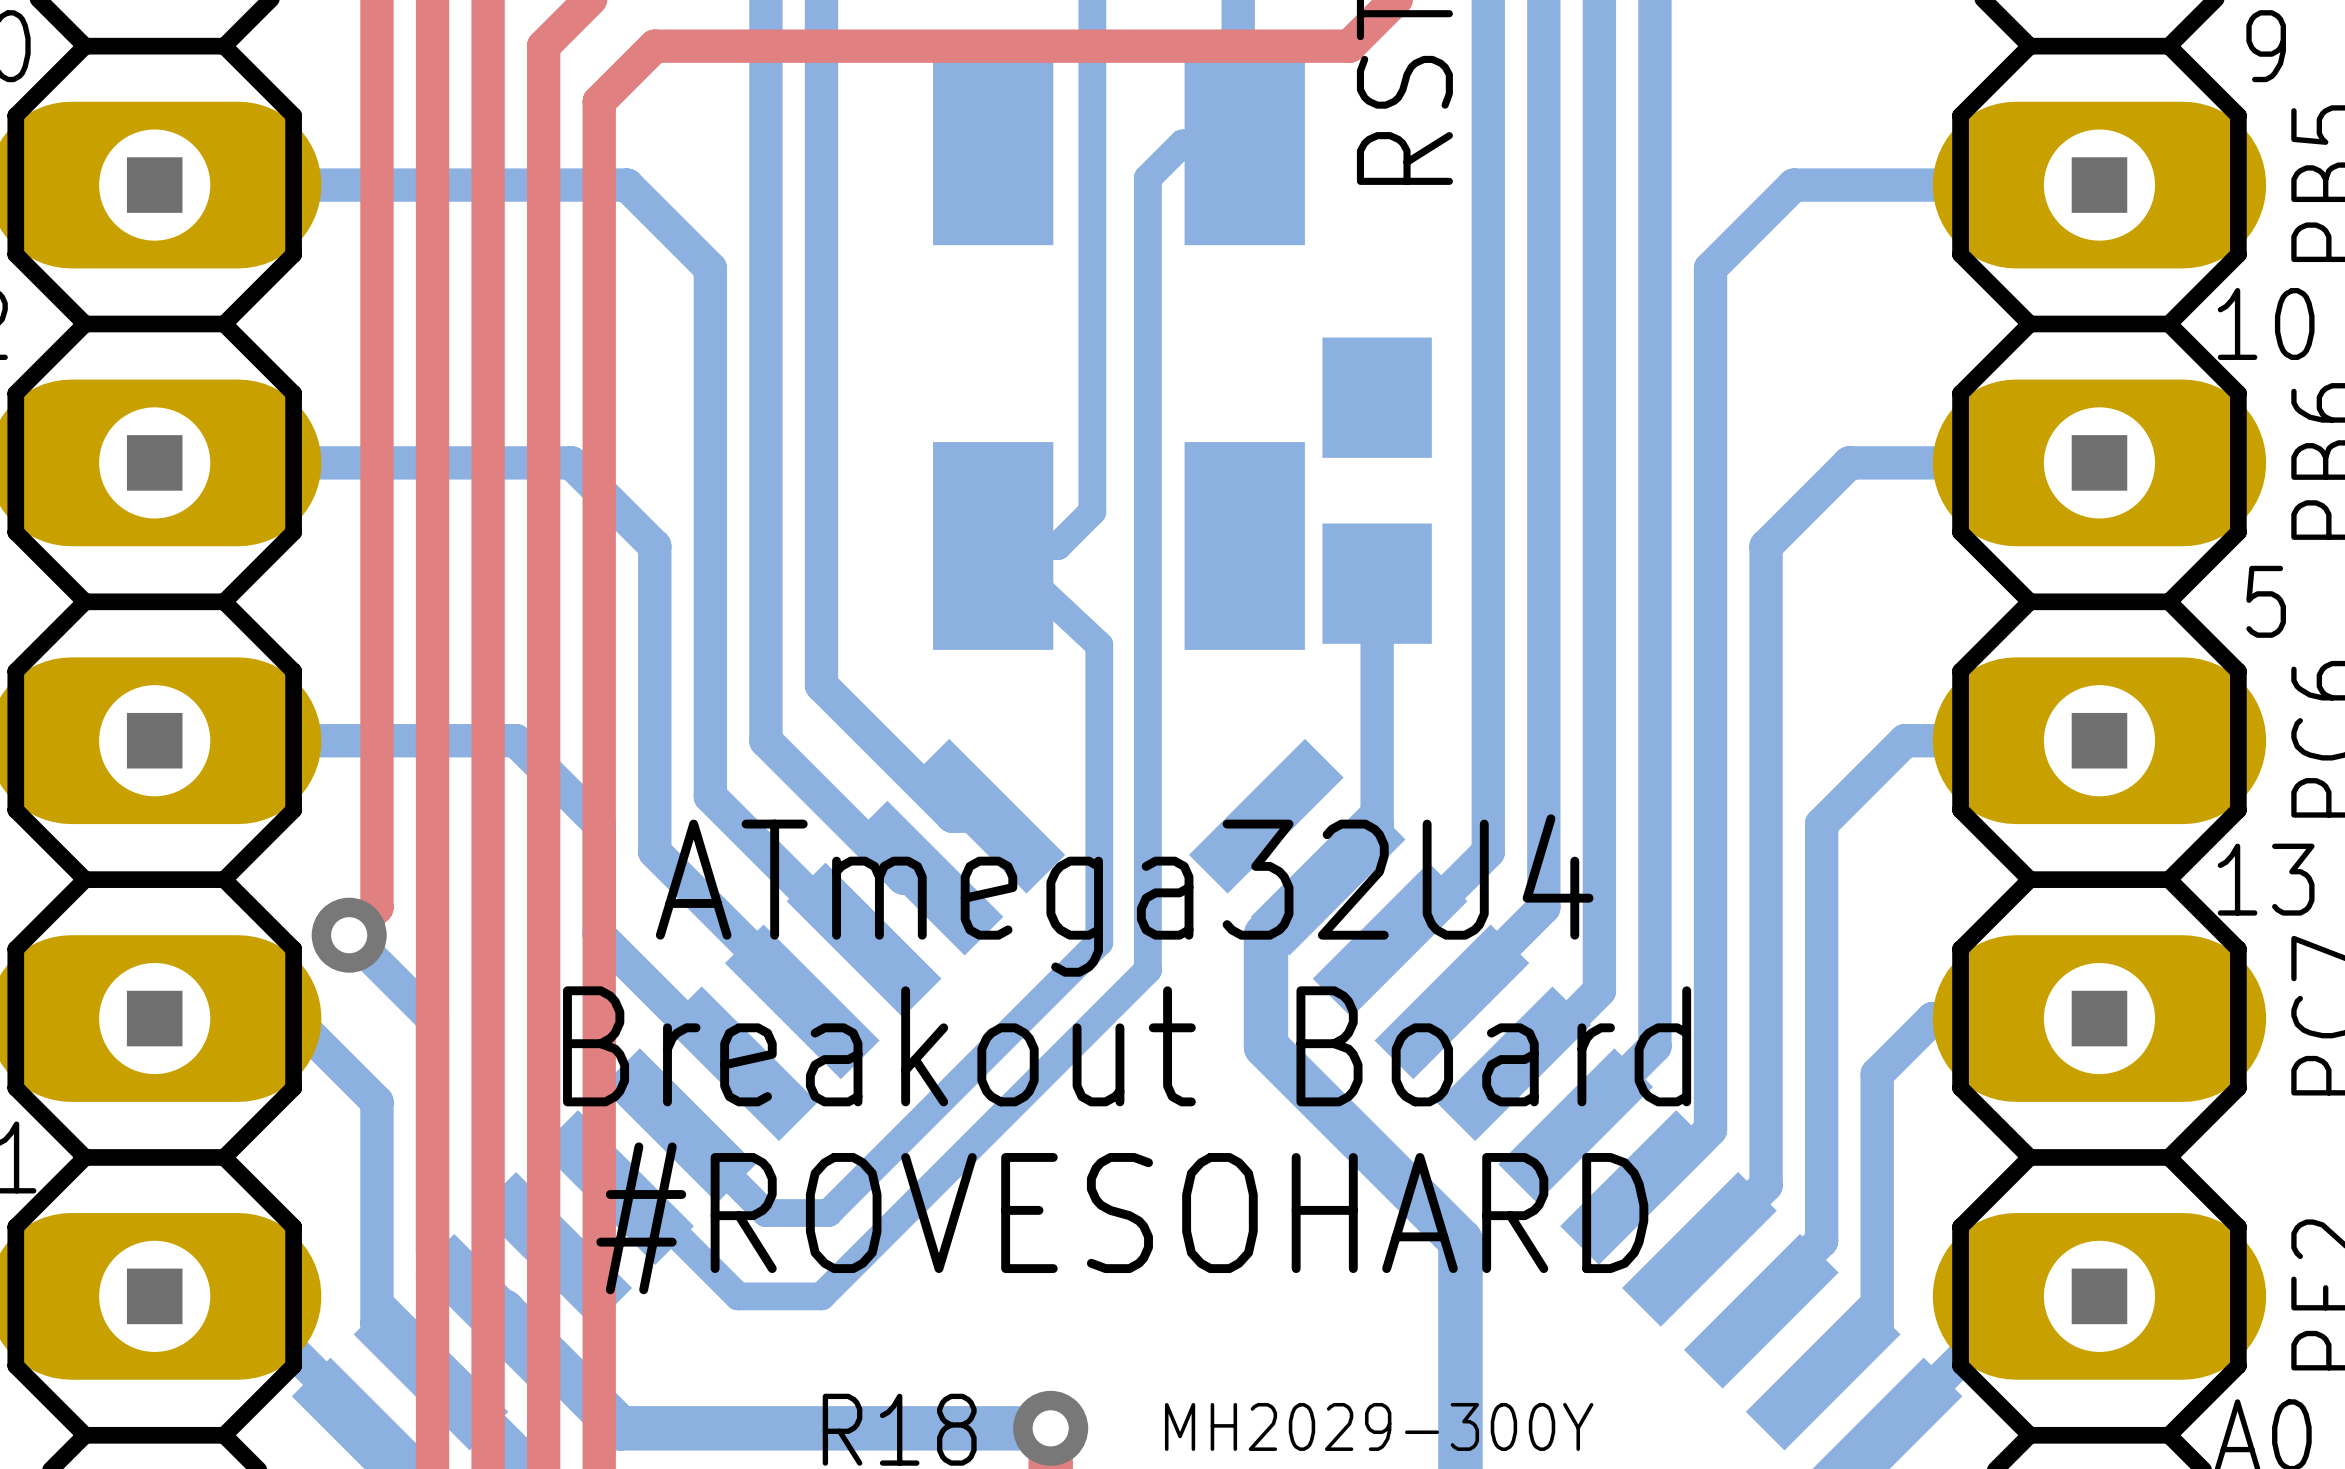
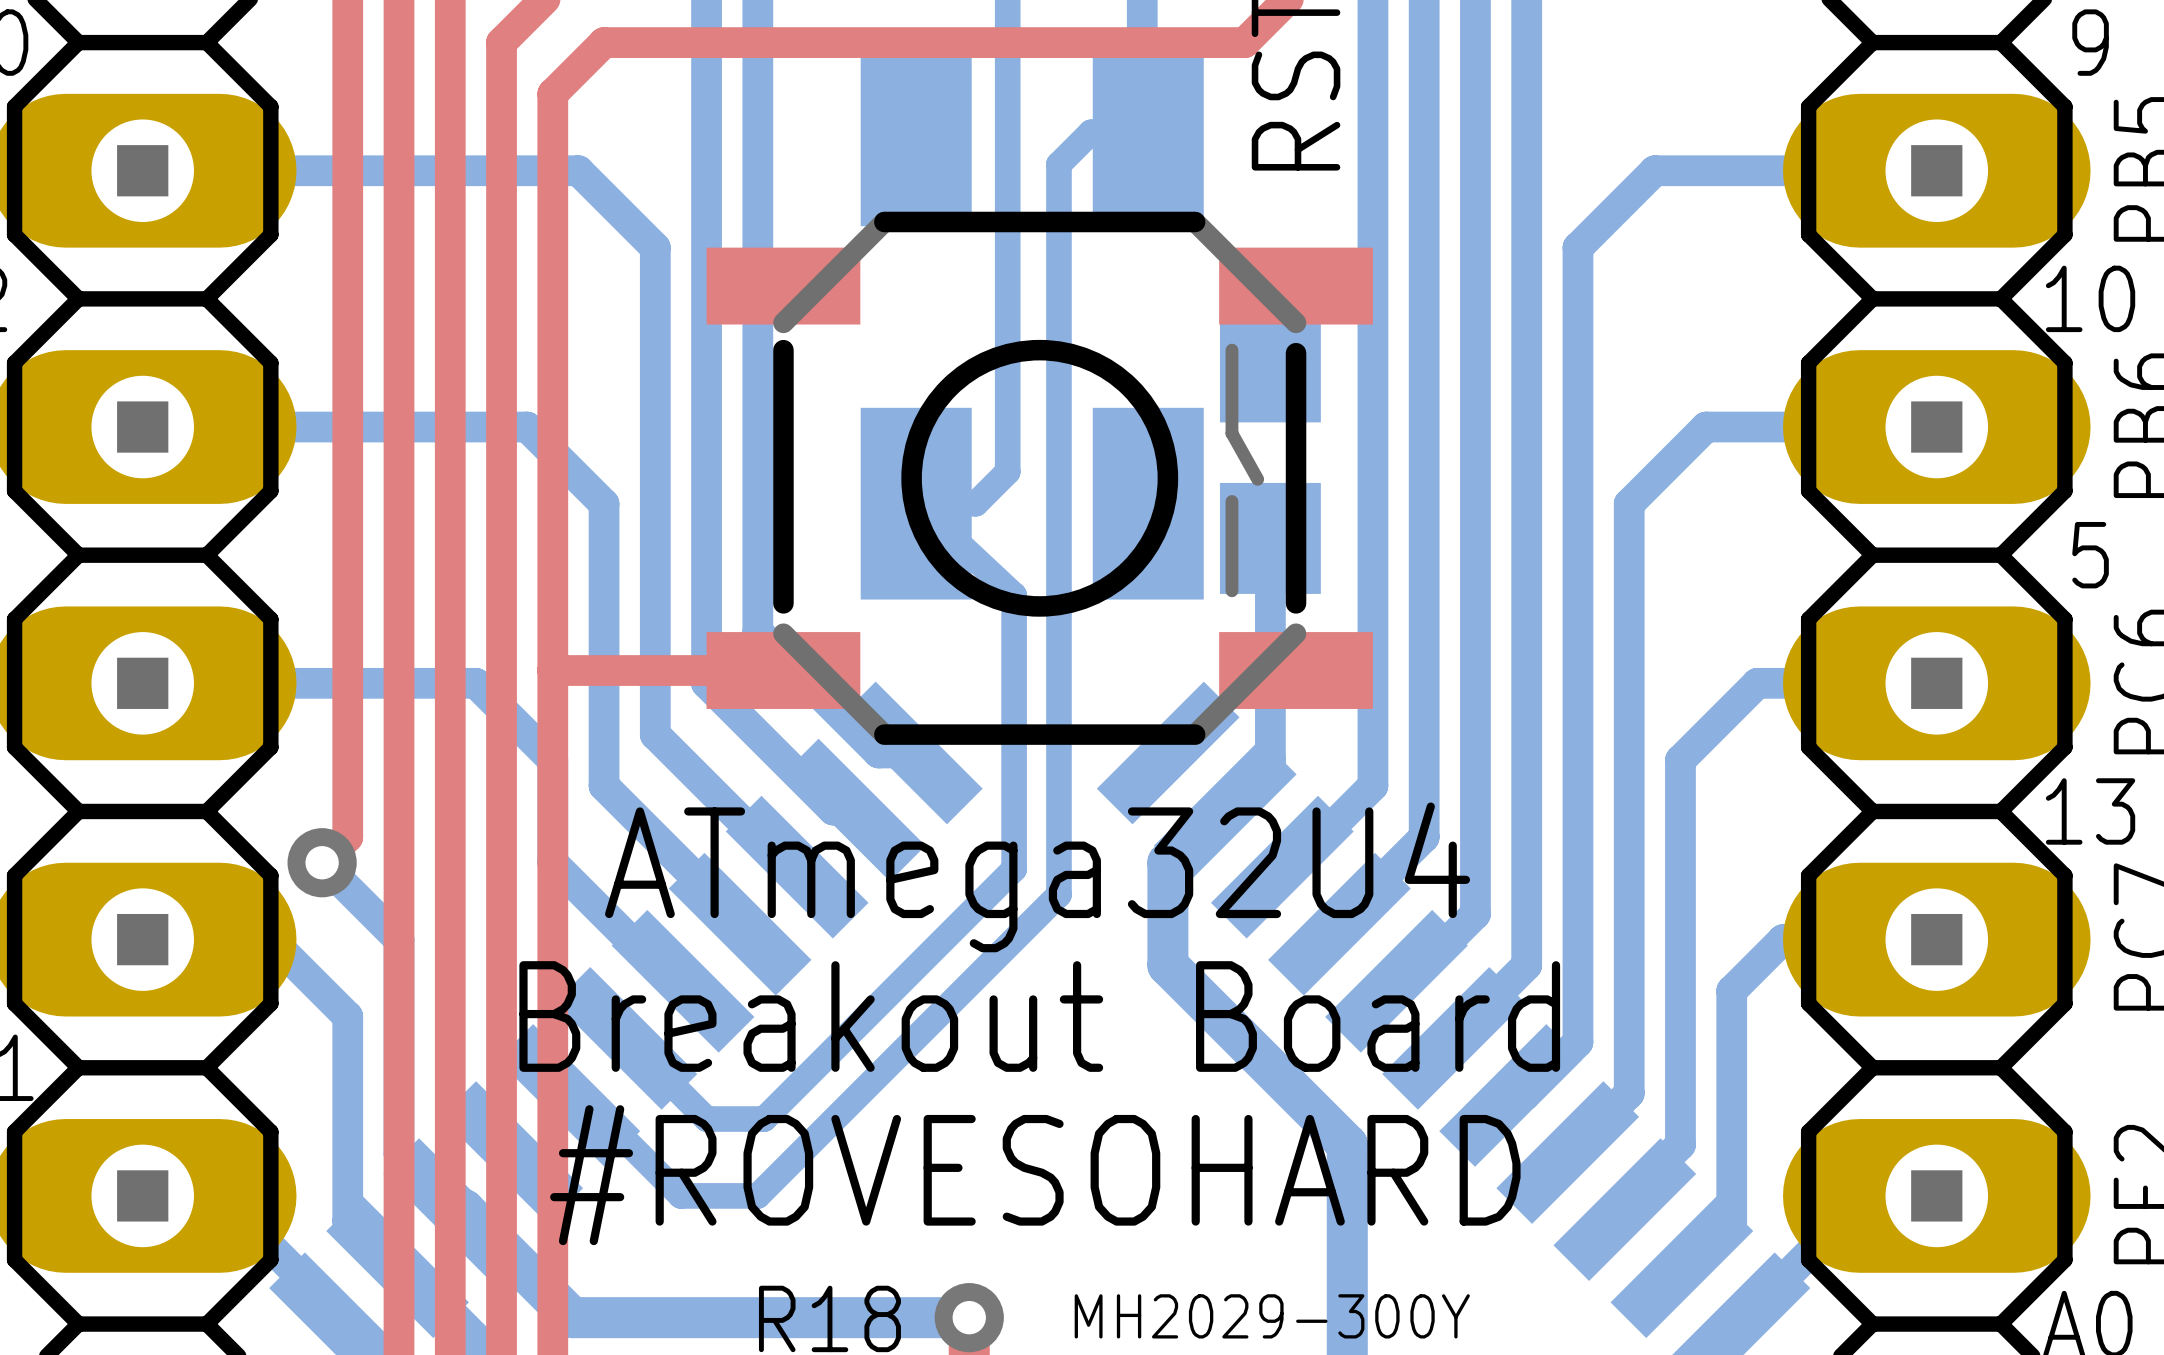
part: none -> (1039, 478)
top track: none -> (552, 670) (783, 670)
text position: ATmega32U4 (1124, 895) -> ATmega32U4 (1037, 877)
text position: Breakout Board (1127, 1046) -> Breakout Board (1039, 1016)
text position: #ROVESOHARD (1122, 1218) -> #ROVESOHARD (1035, 1175)

